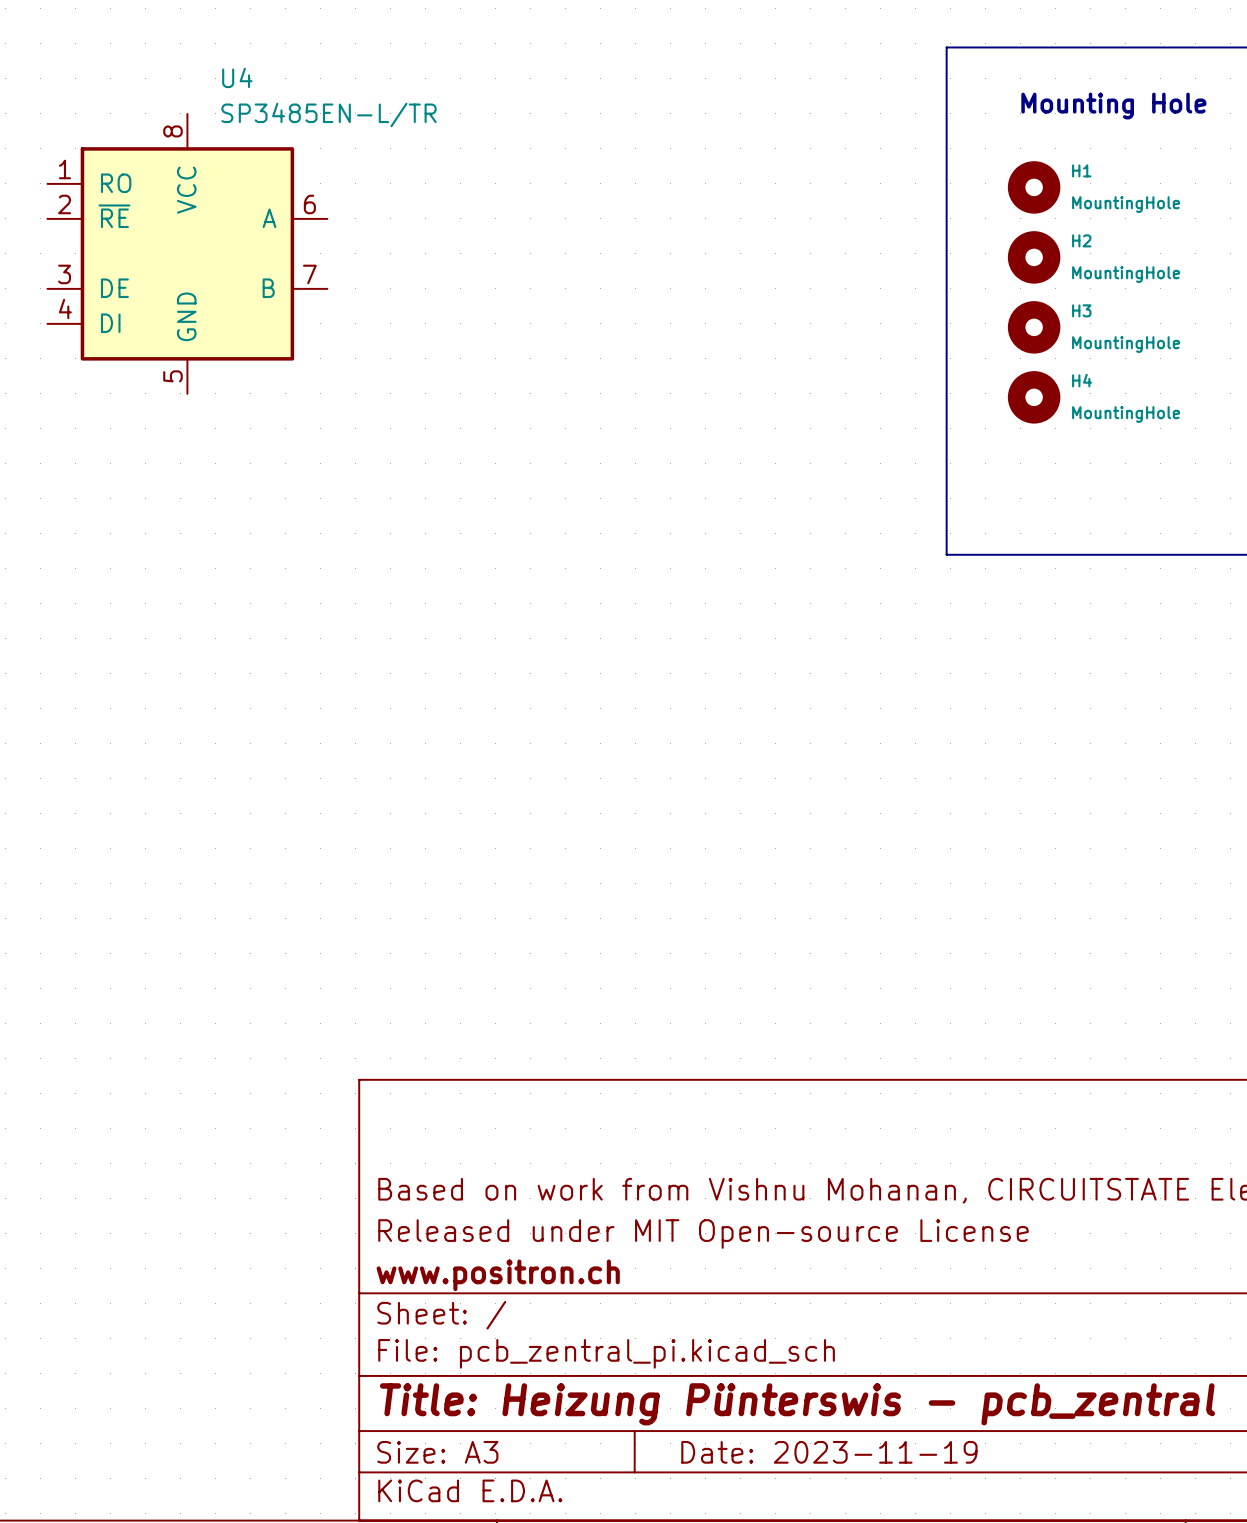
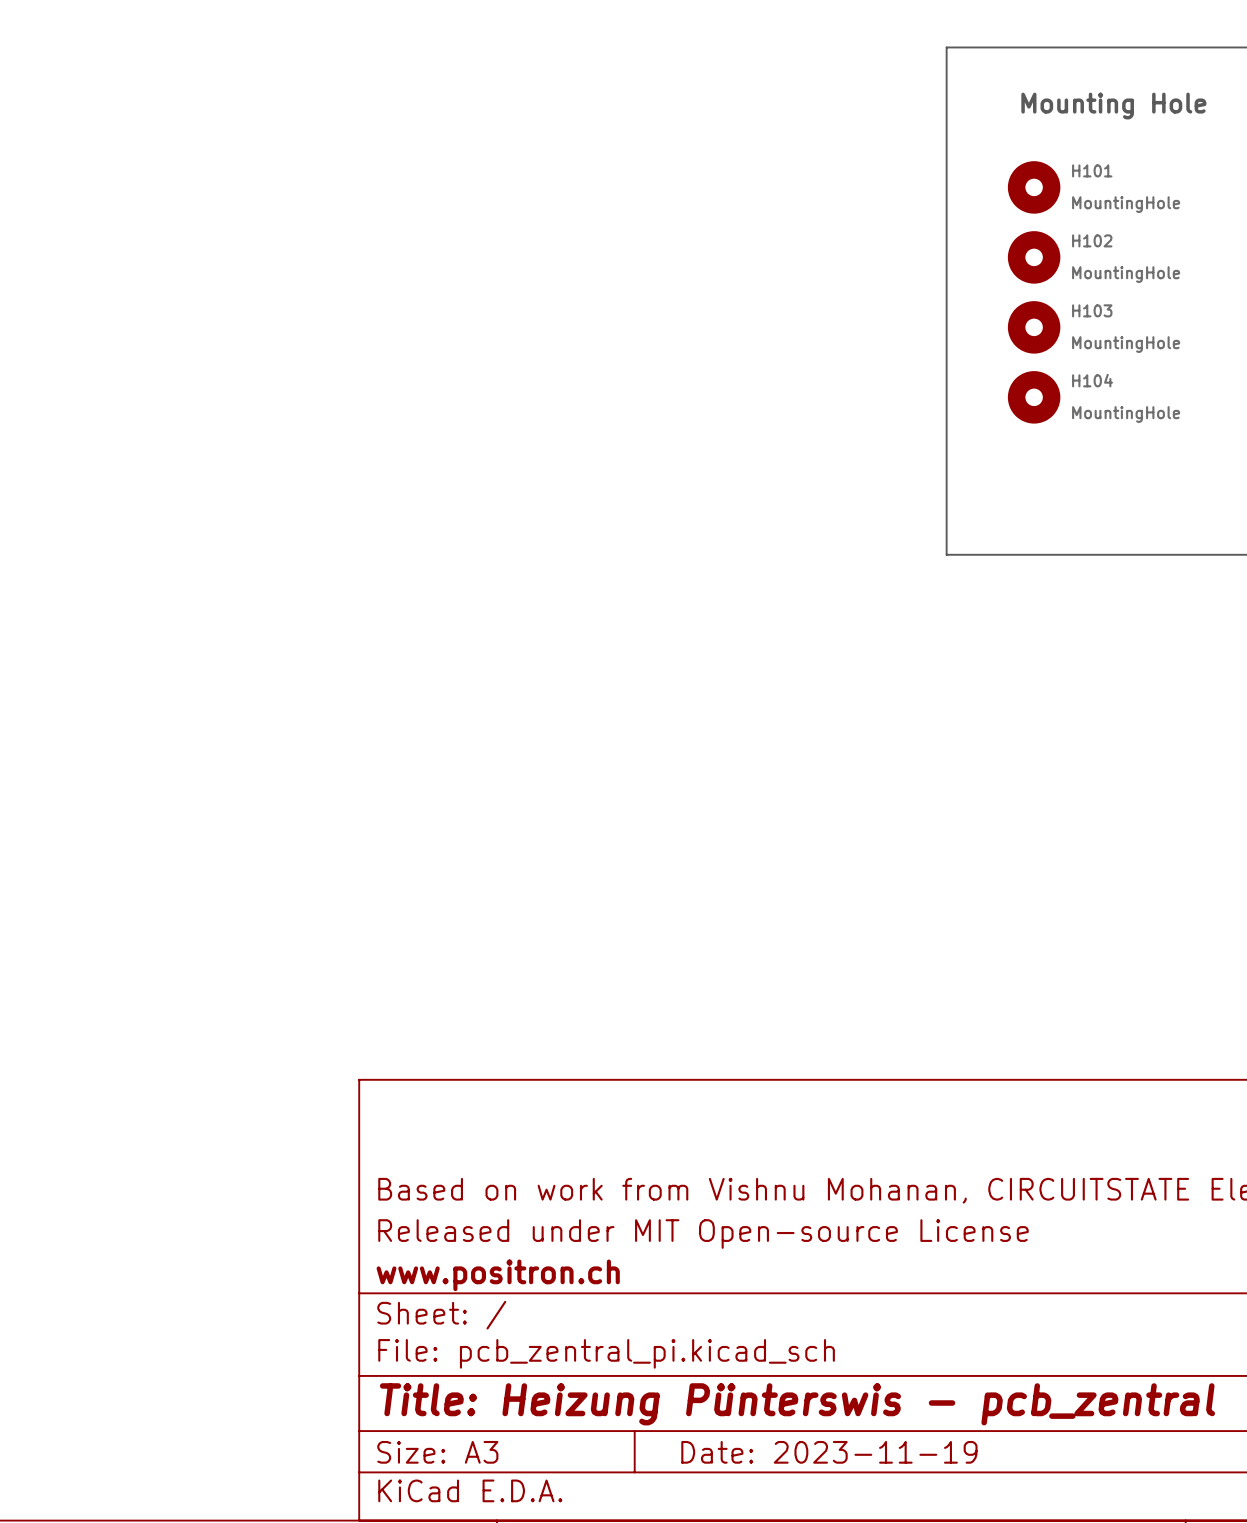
H1 name: H1 (1081, 170) -> H101 (1092, 170)
H2 name: H2 (1081, 240) -> H102 (1092, 240)
U4: SP3485EN-L/TR (187, 253) -> none
H3 name: H3 (1081, 310) -> H103 (1092, 310)
H4 name: H4 (1082, 380) -> H104 (1092, 380)

